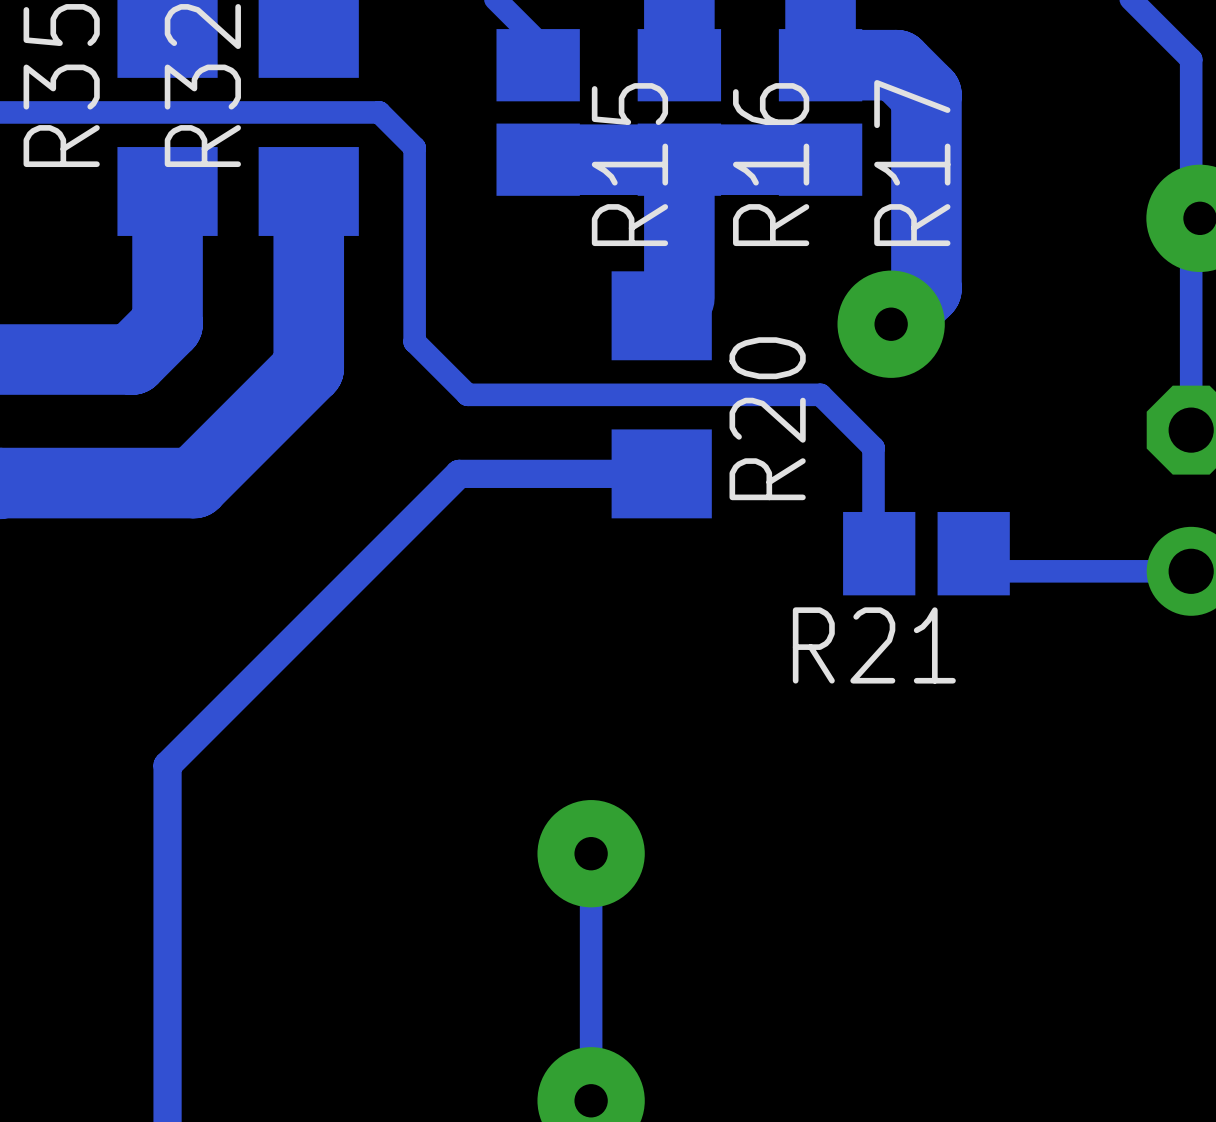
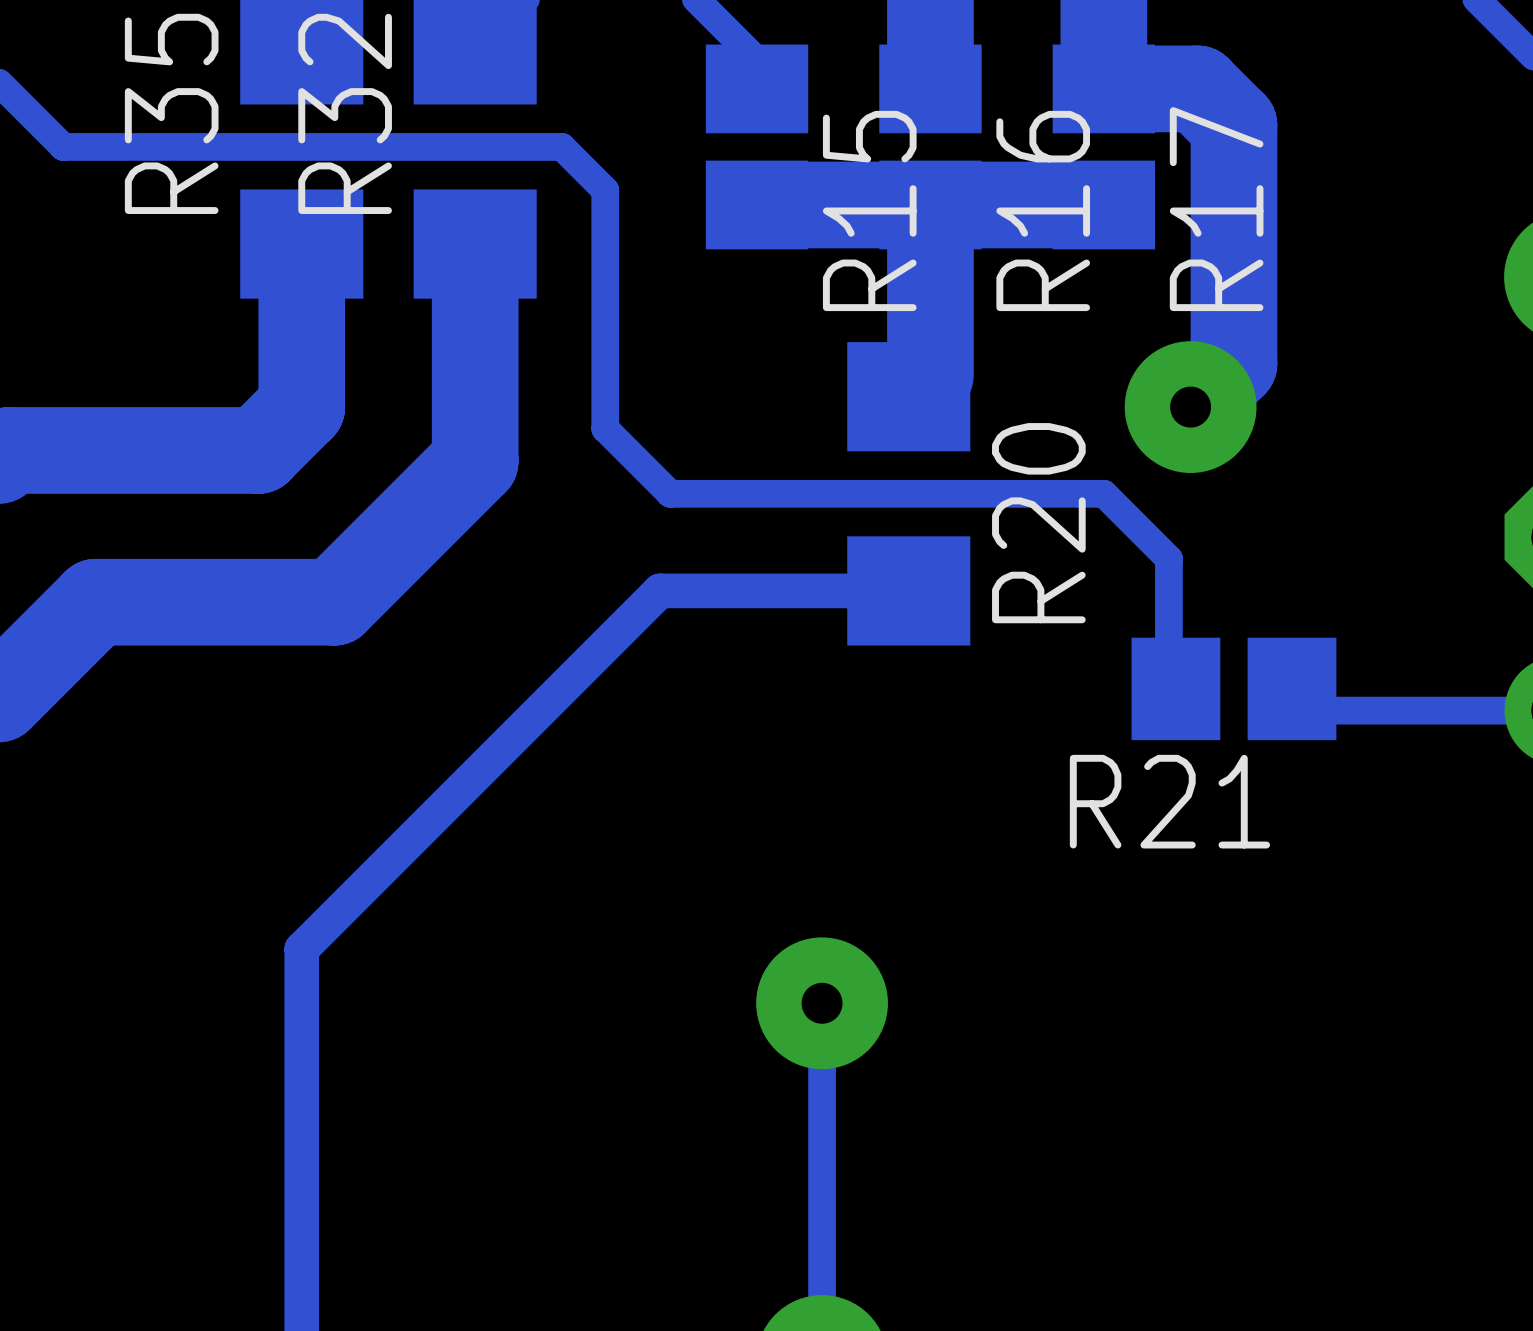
via position: (591, 853) -> (822, 1003)

